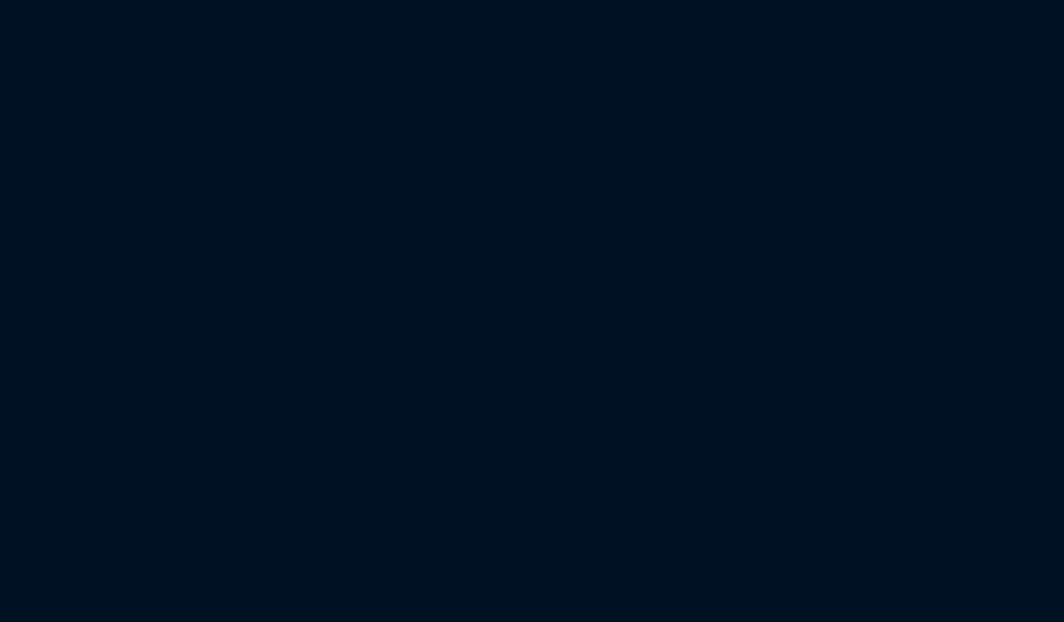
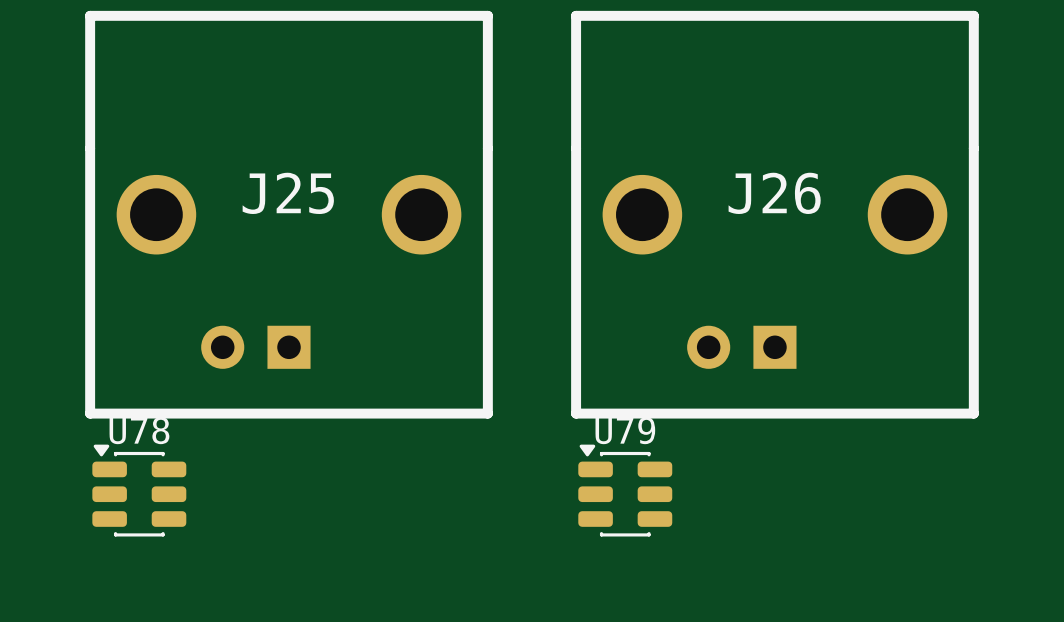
J25: none -> (289, 214)
J26: none -> (774, 214)
U78: none -> (139, 490)
U79: none -> (625, 490)

